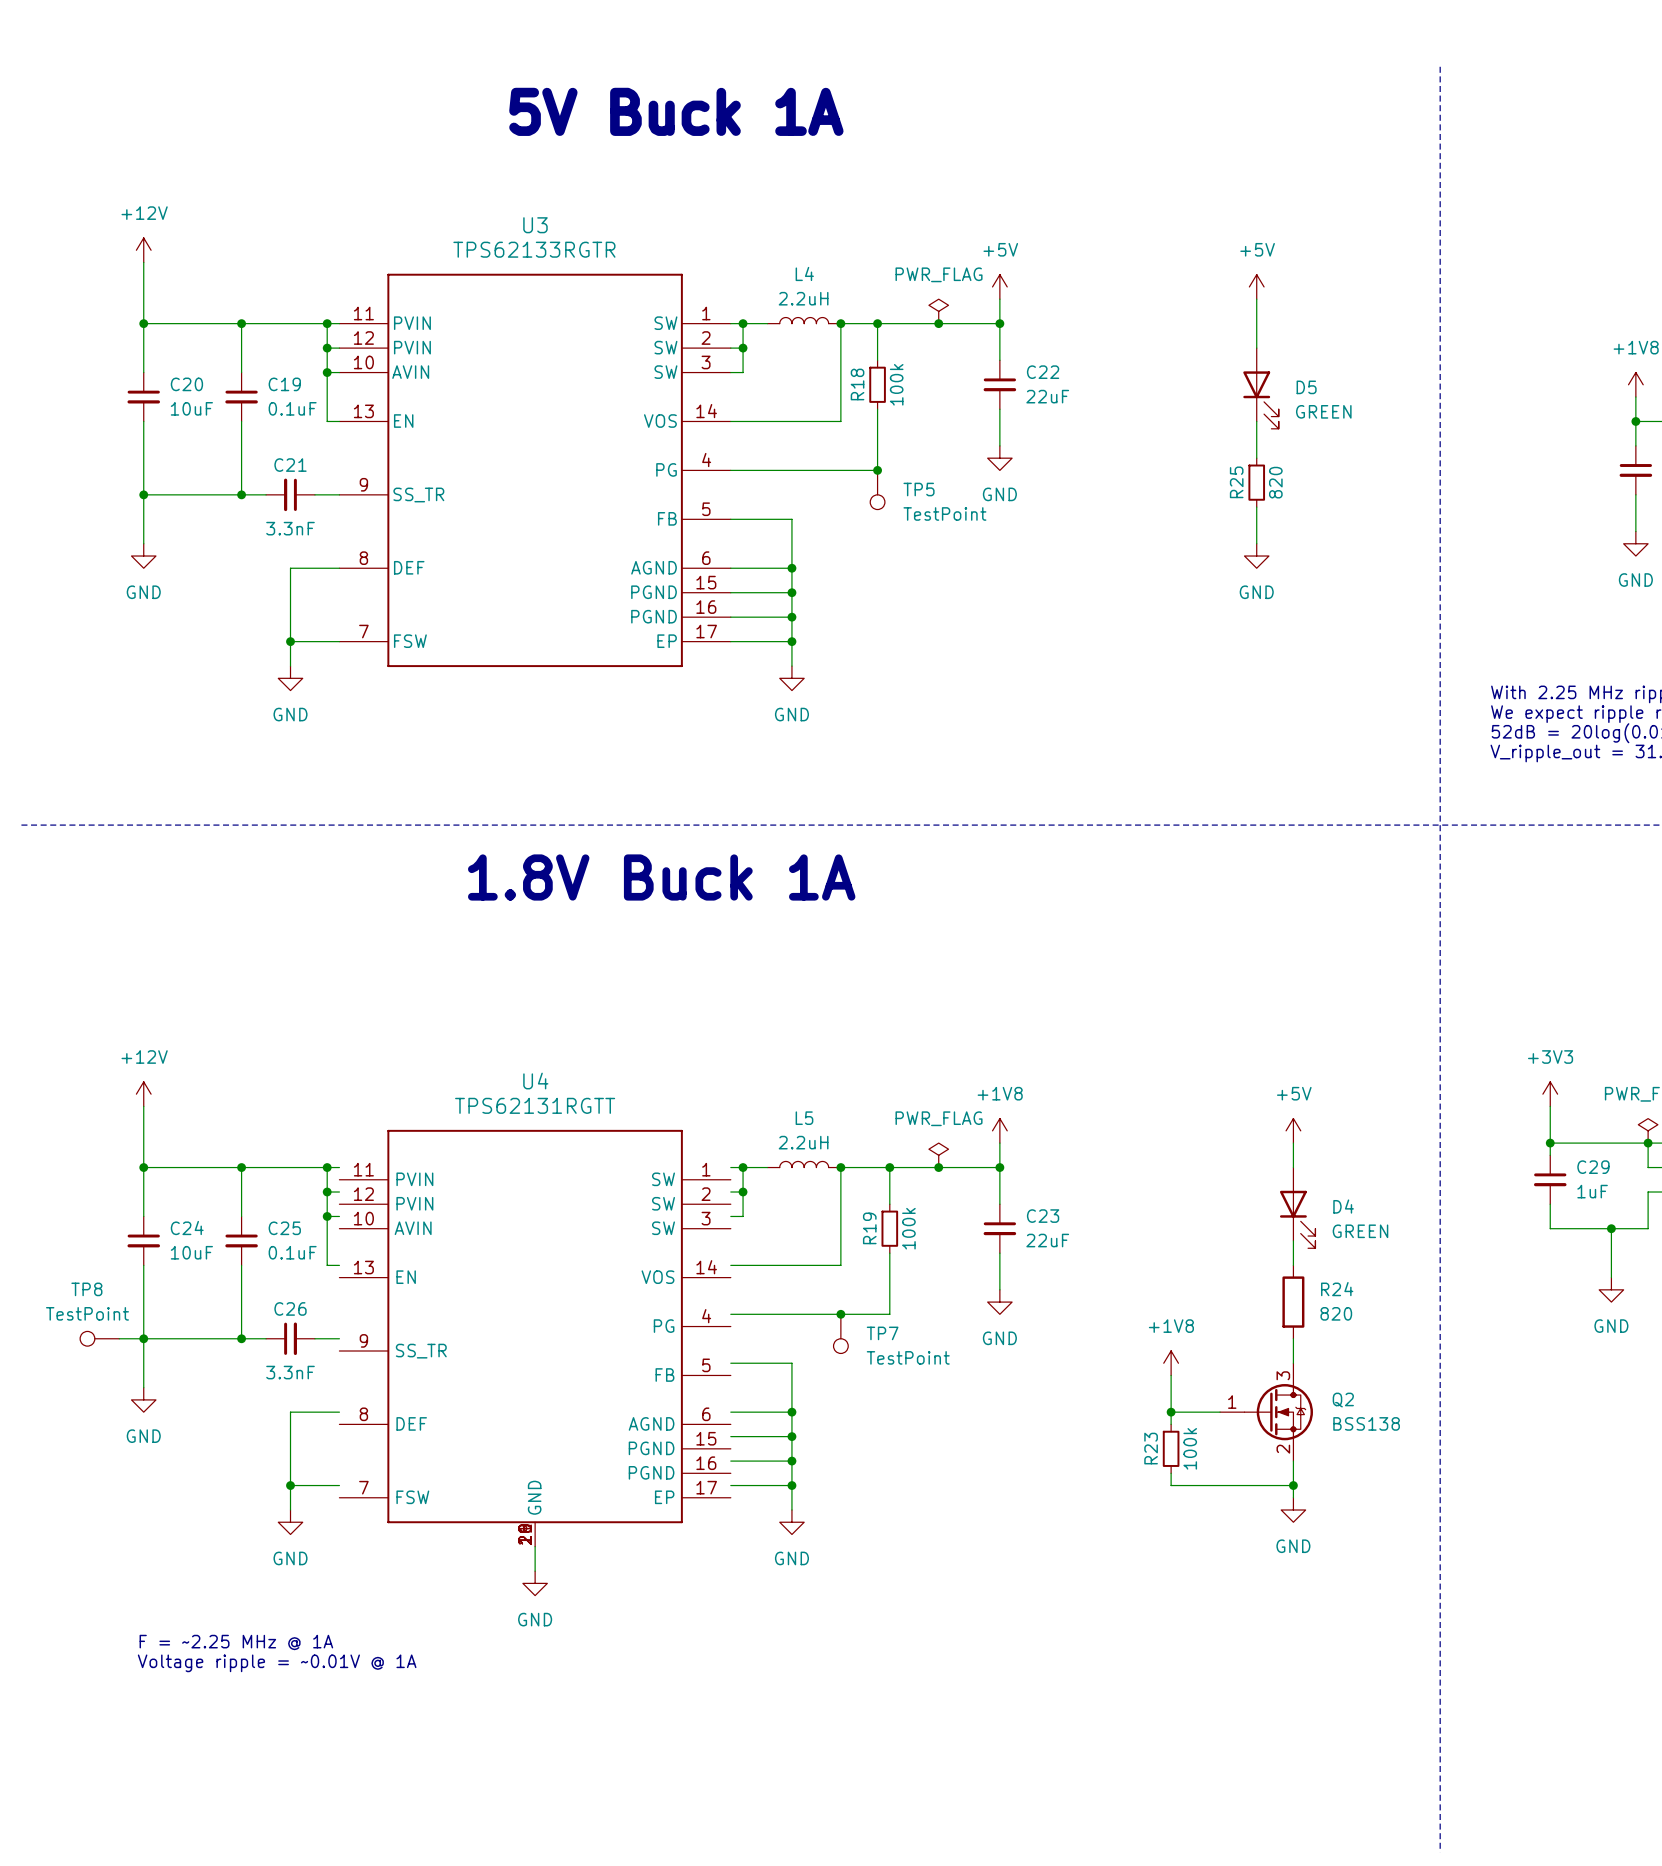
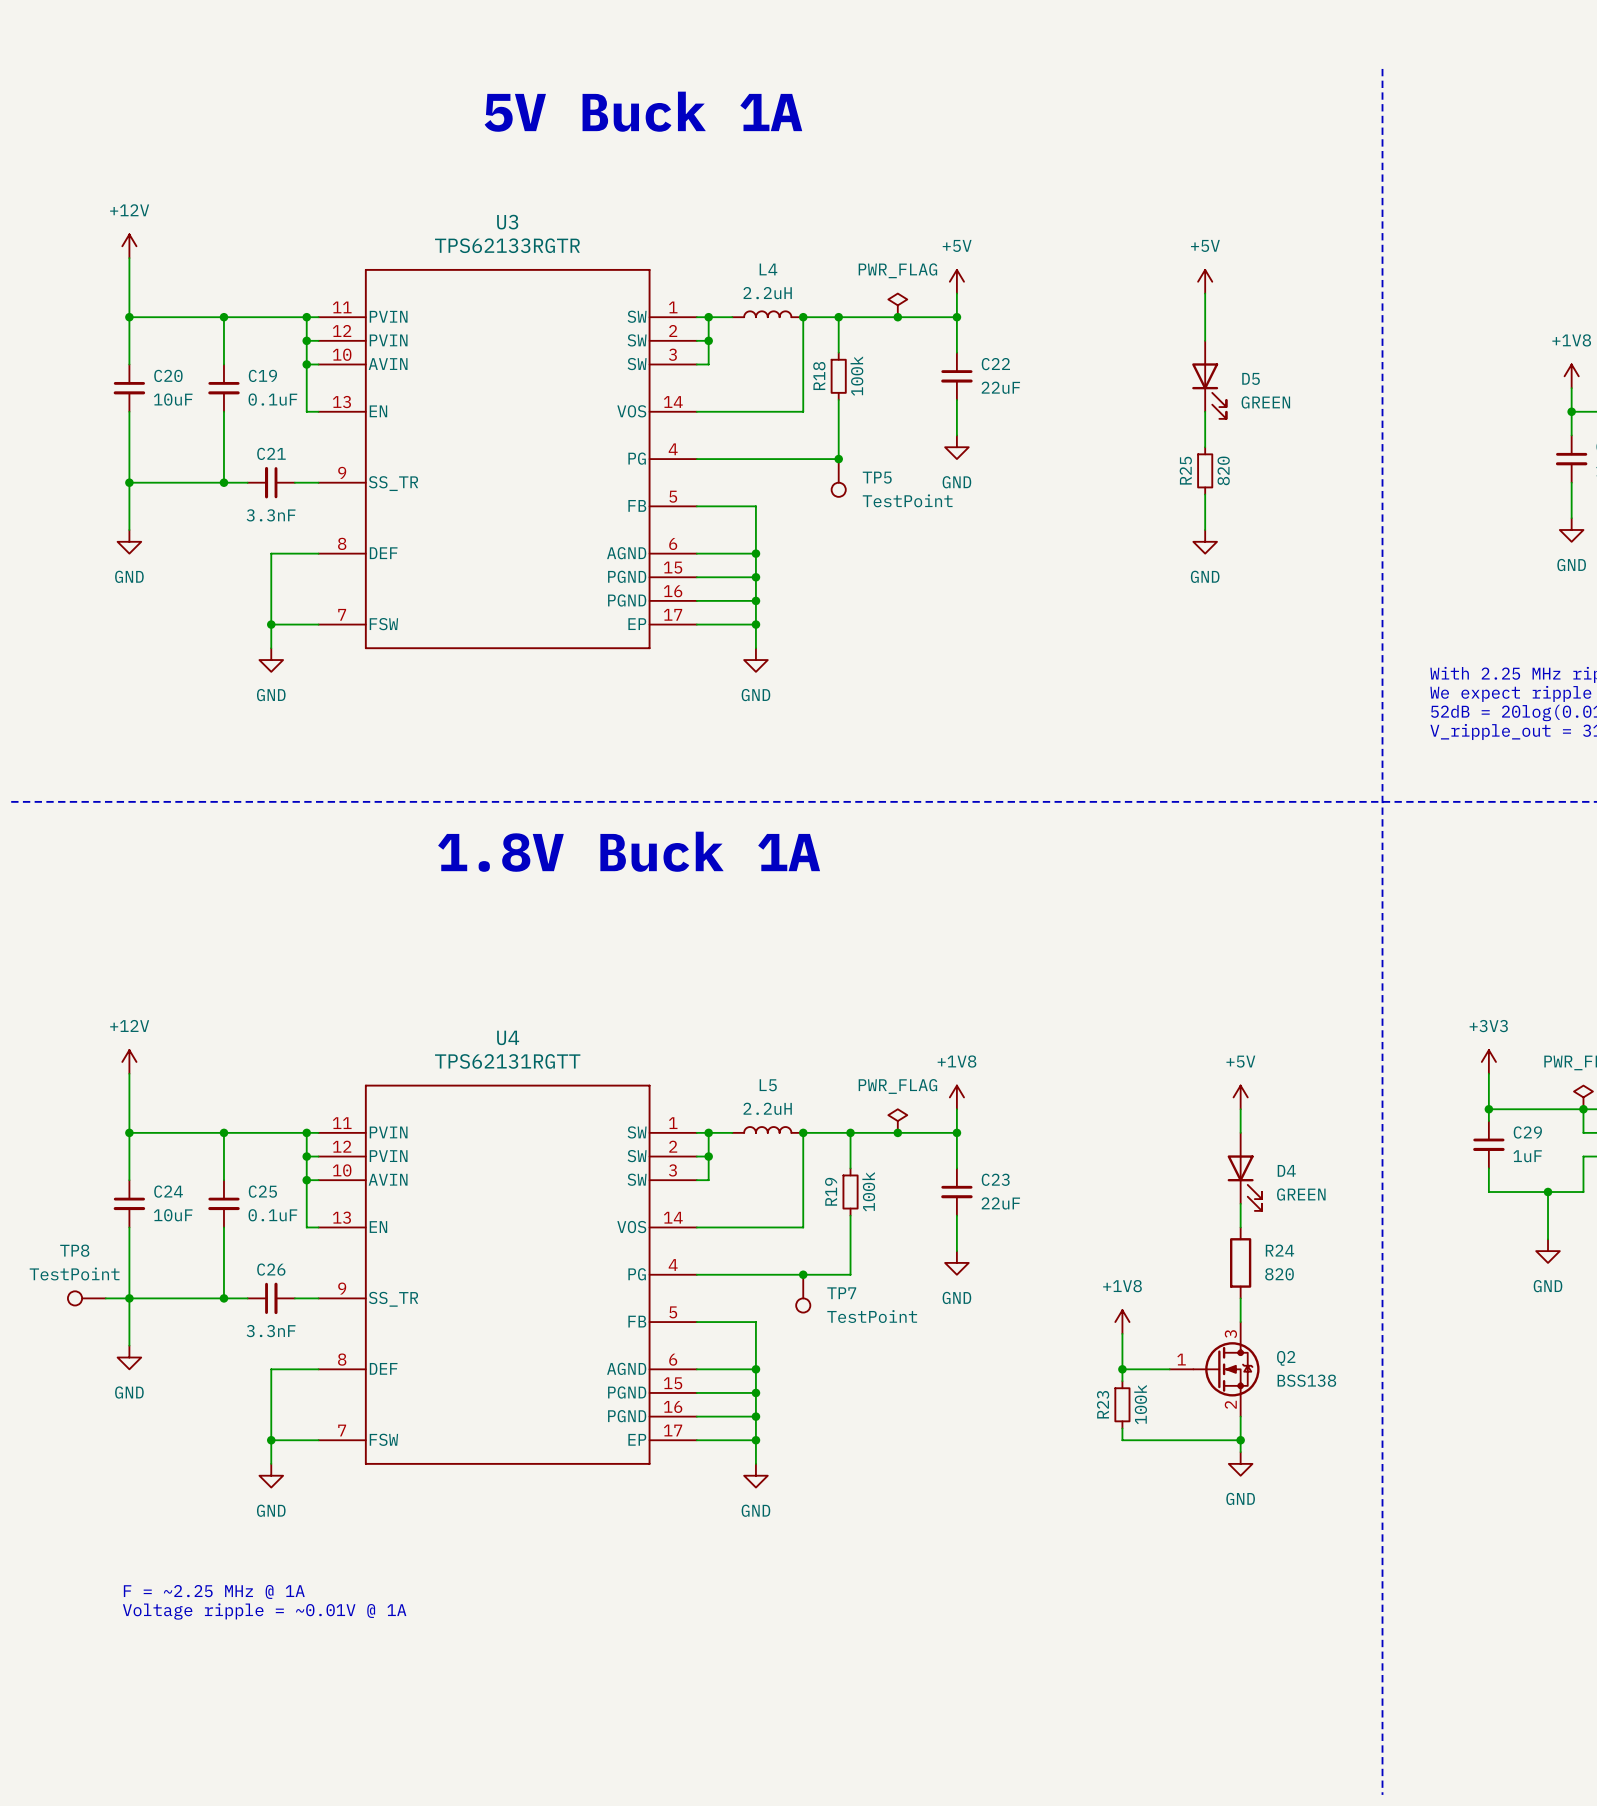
U4 symbol: [339, 1129, 731, 1547] -> [318, 1084, 697, 1465]
wire: (535, 1546) (535, 1571) -> none
power symbol: GND (535, 1583) -> none

